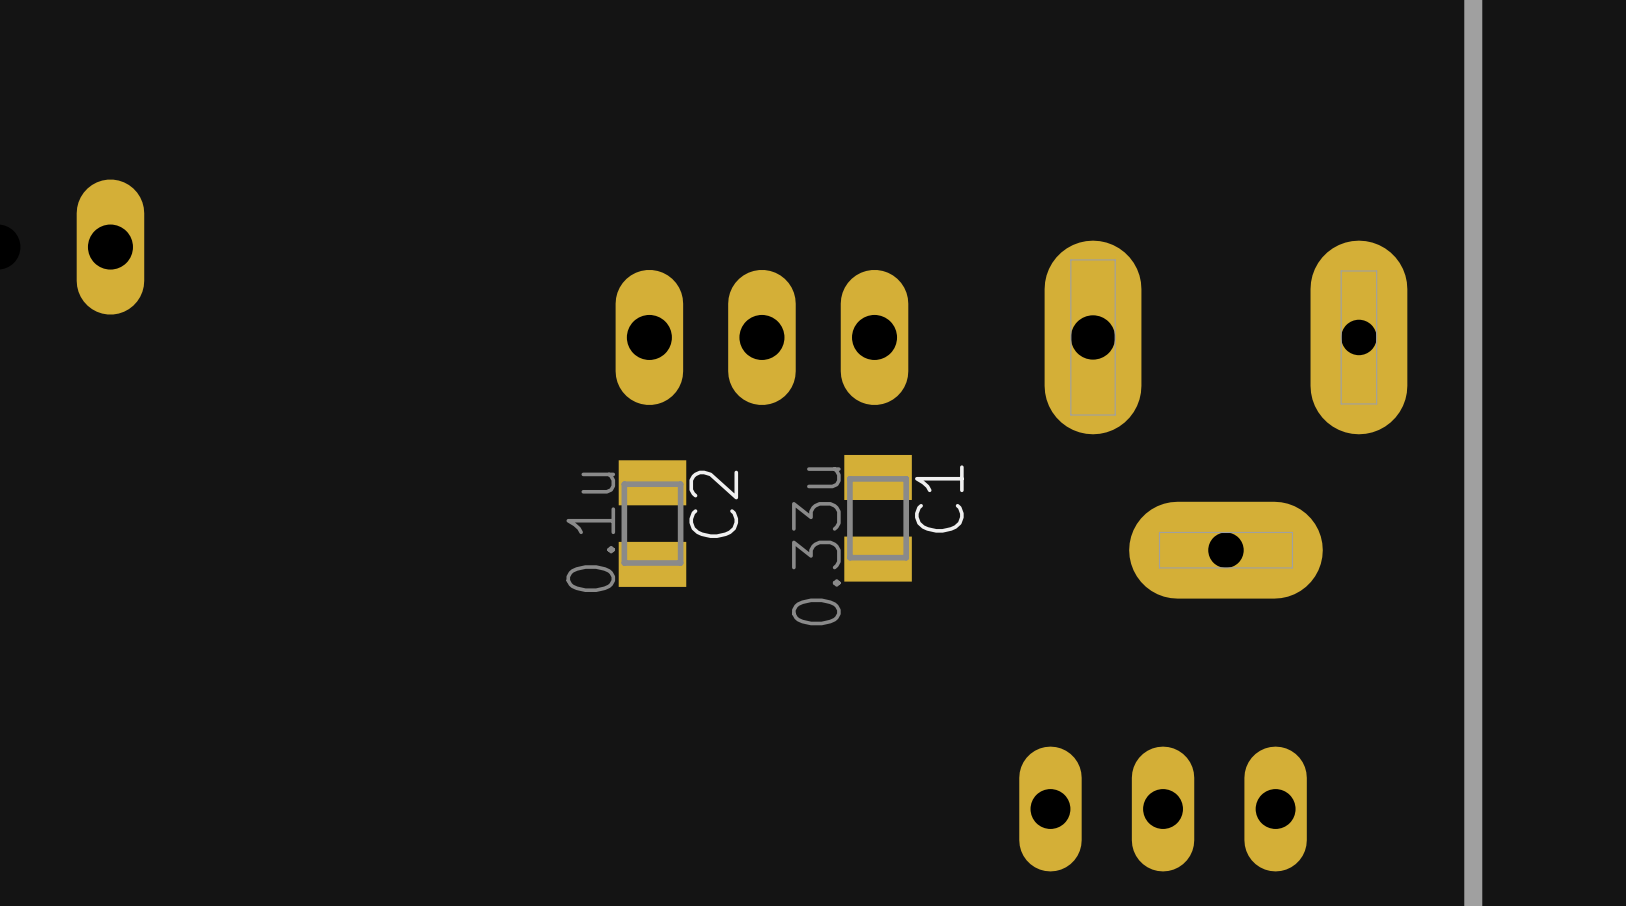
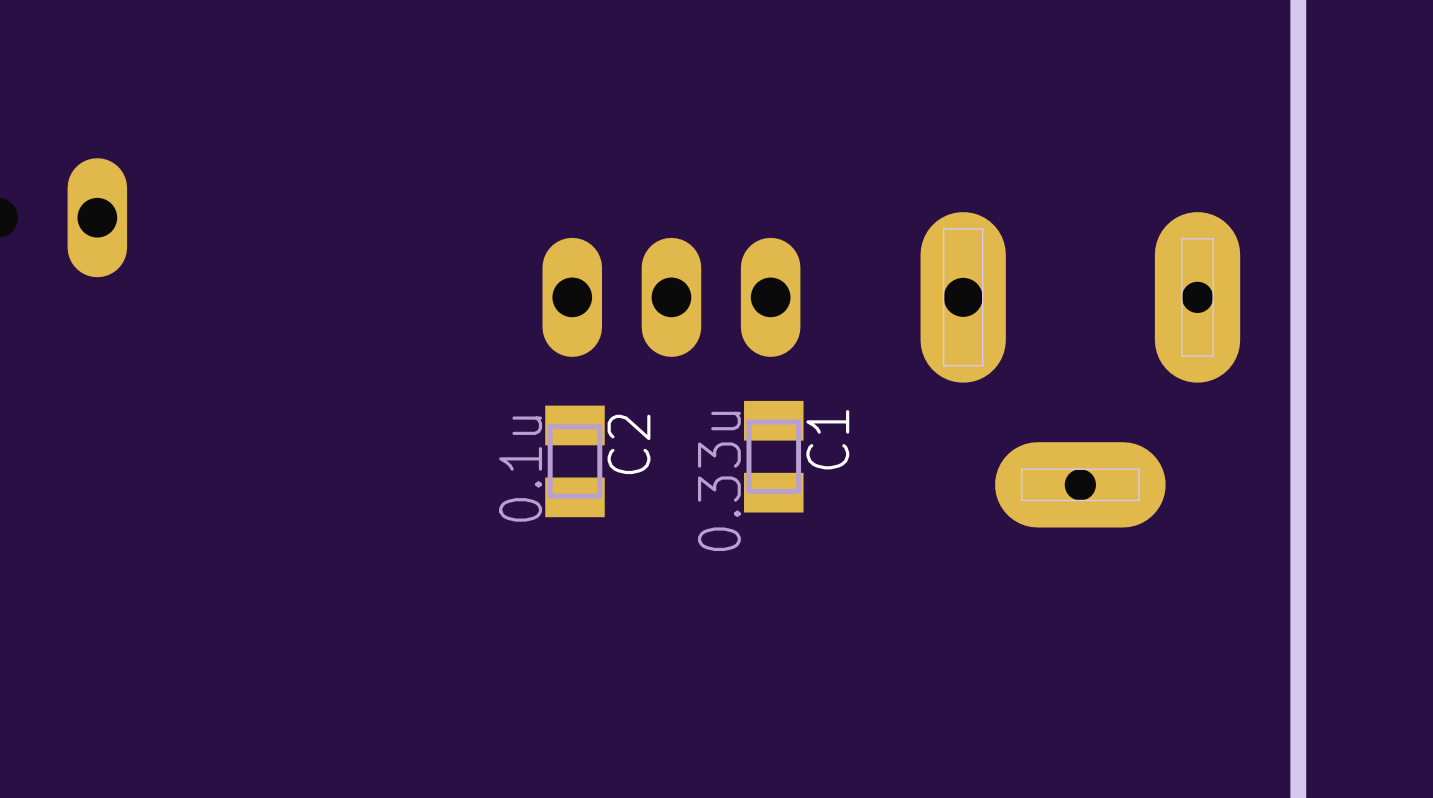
part: (1163, 809) -> none

